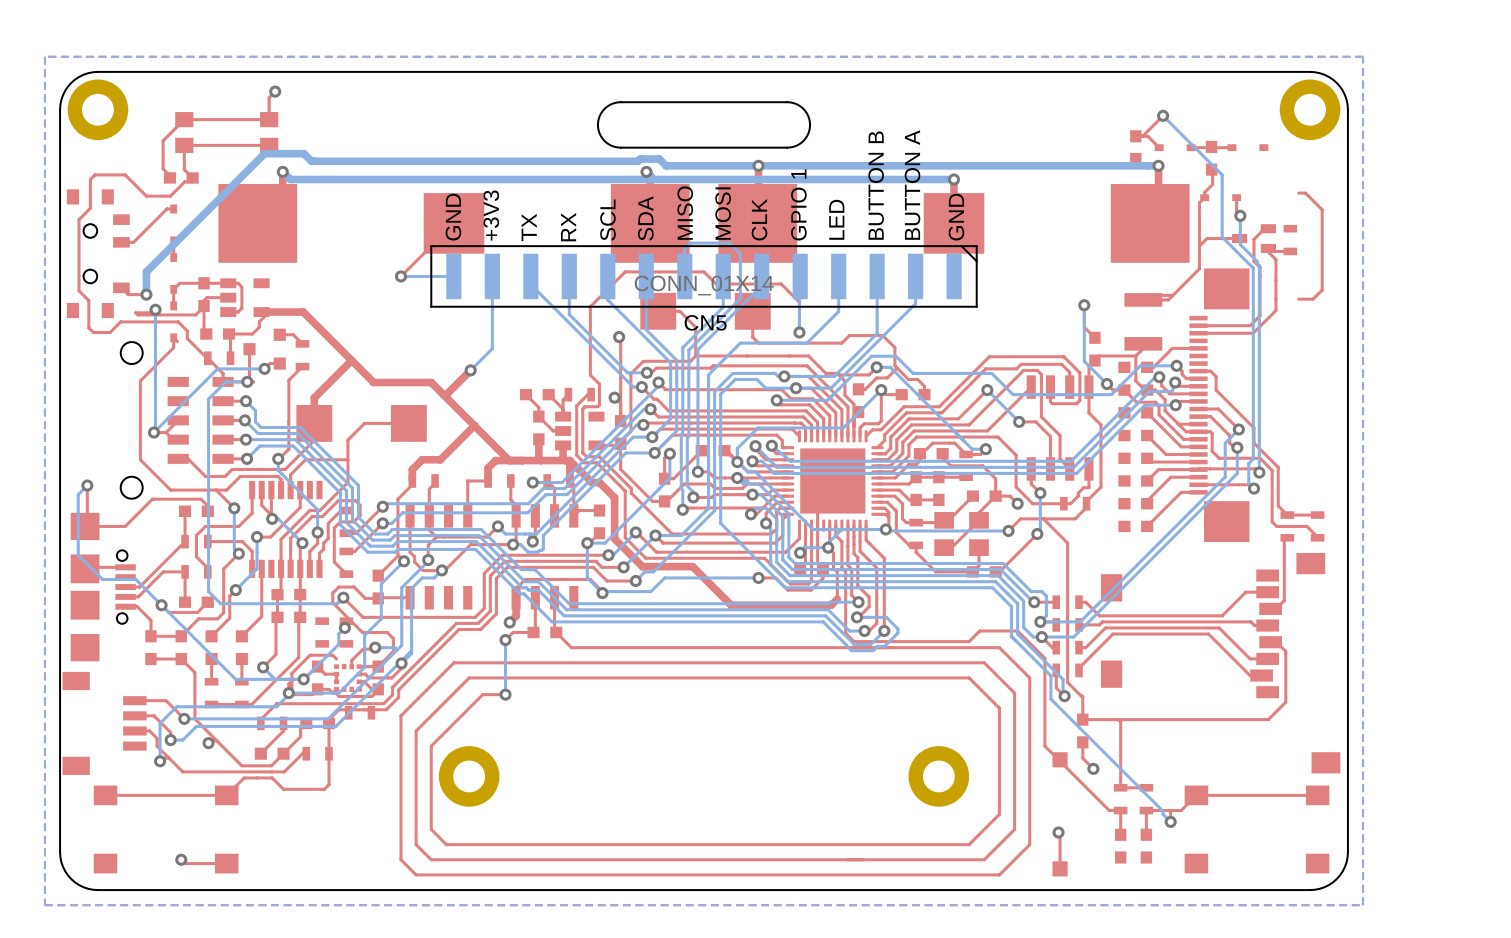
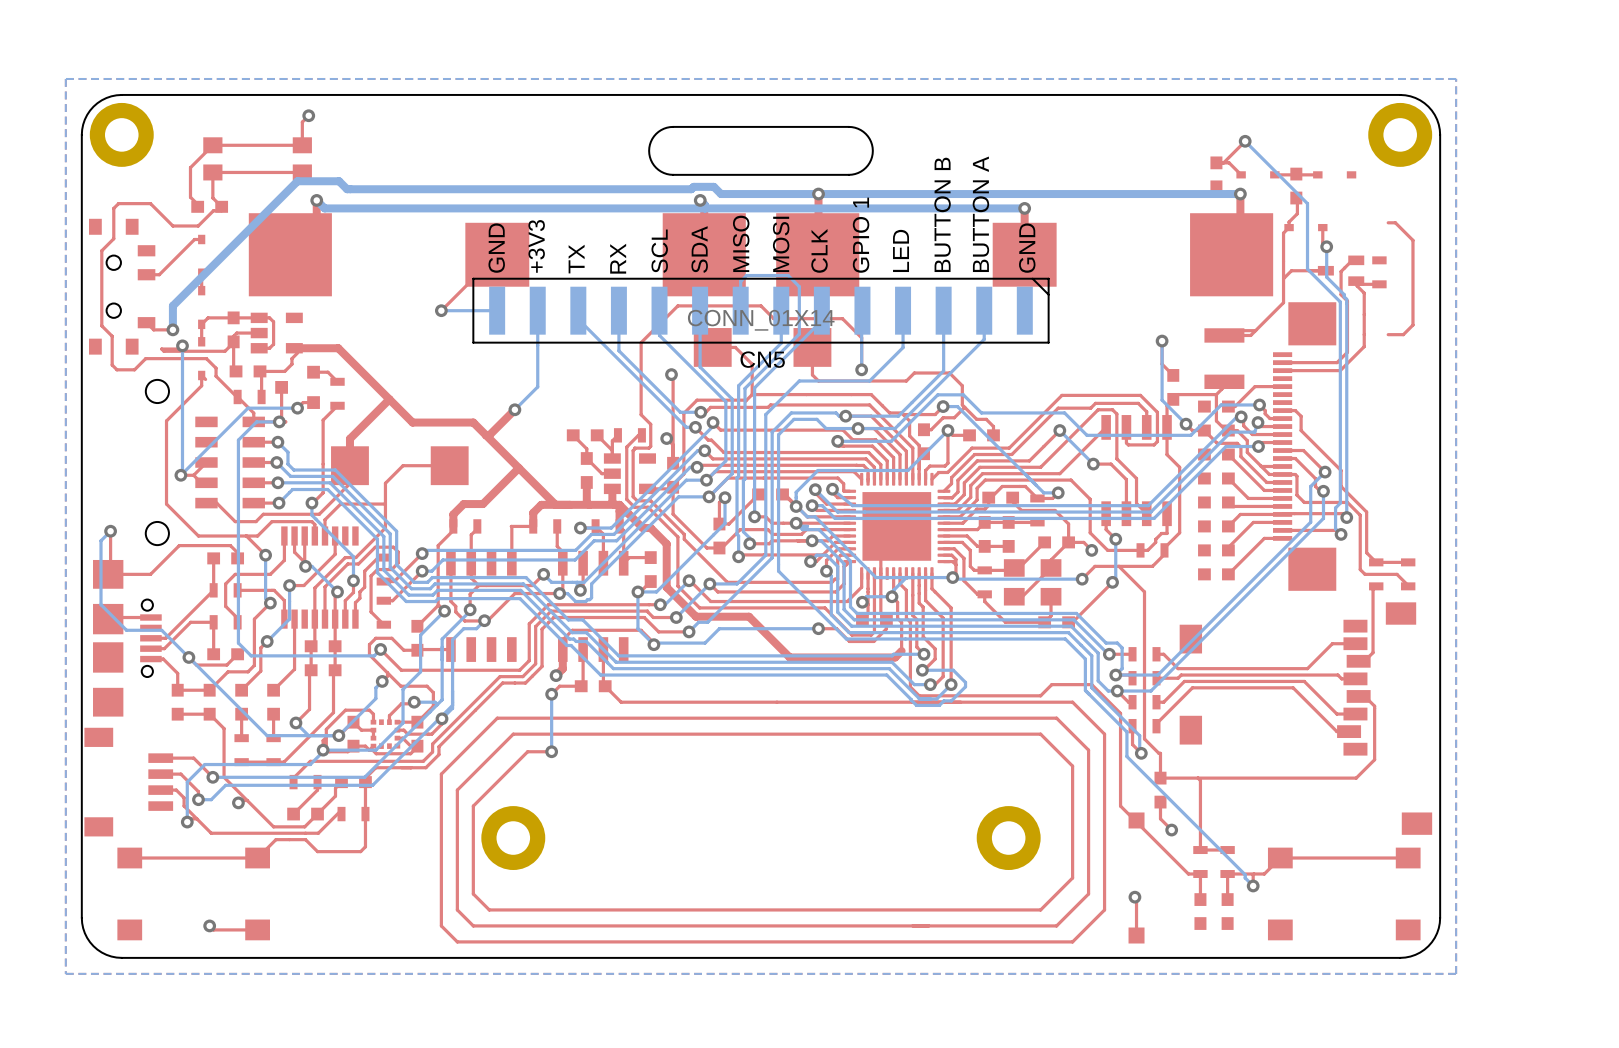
part: (322, 632) -> none
part: (346, 632) -> none
top track: none -> (373, 714) (373, 722)
part: (360, 712) -> none

